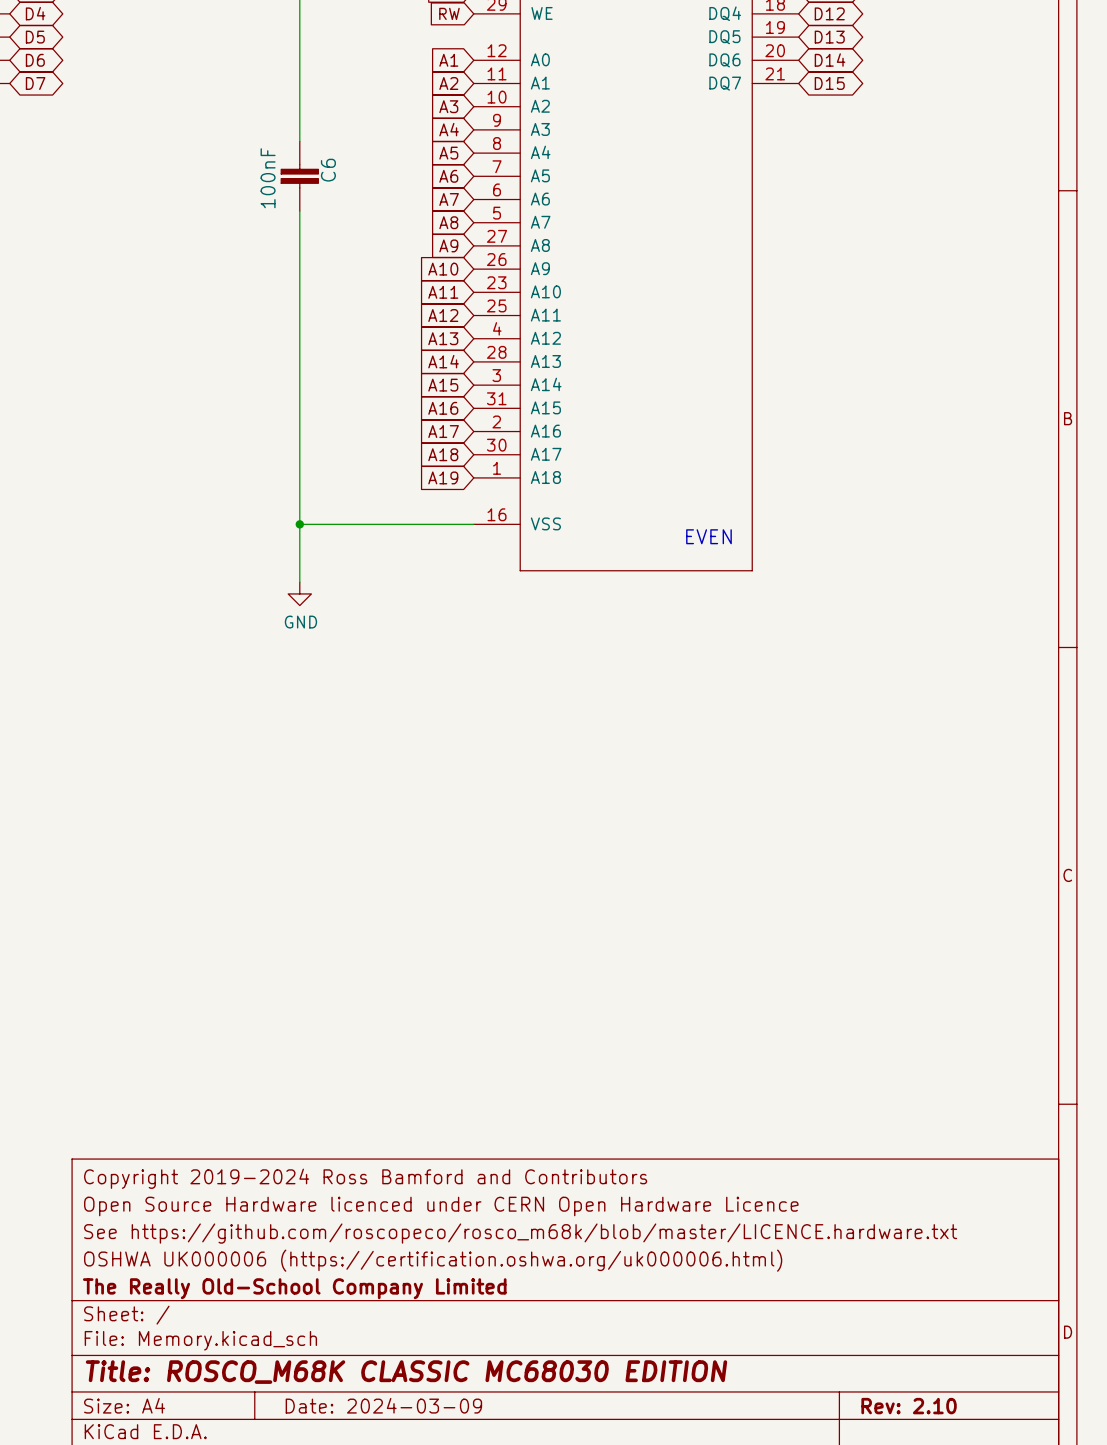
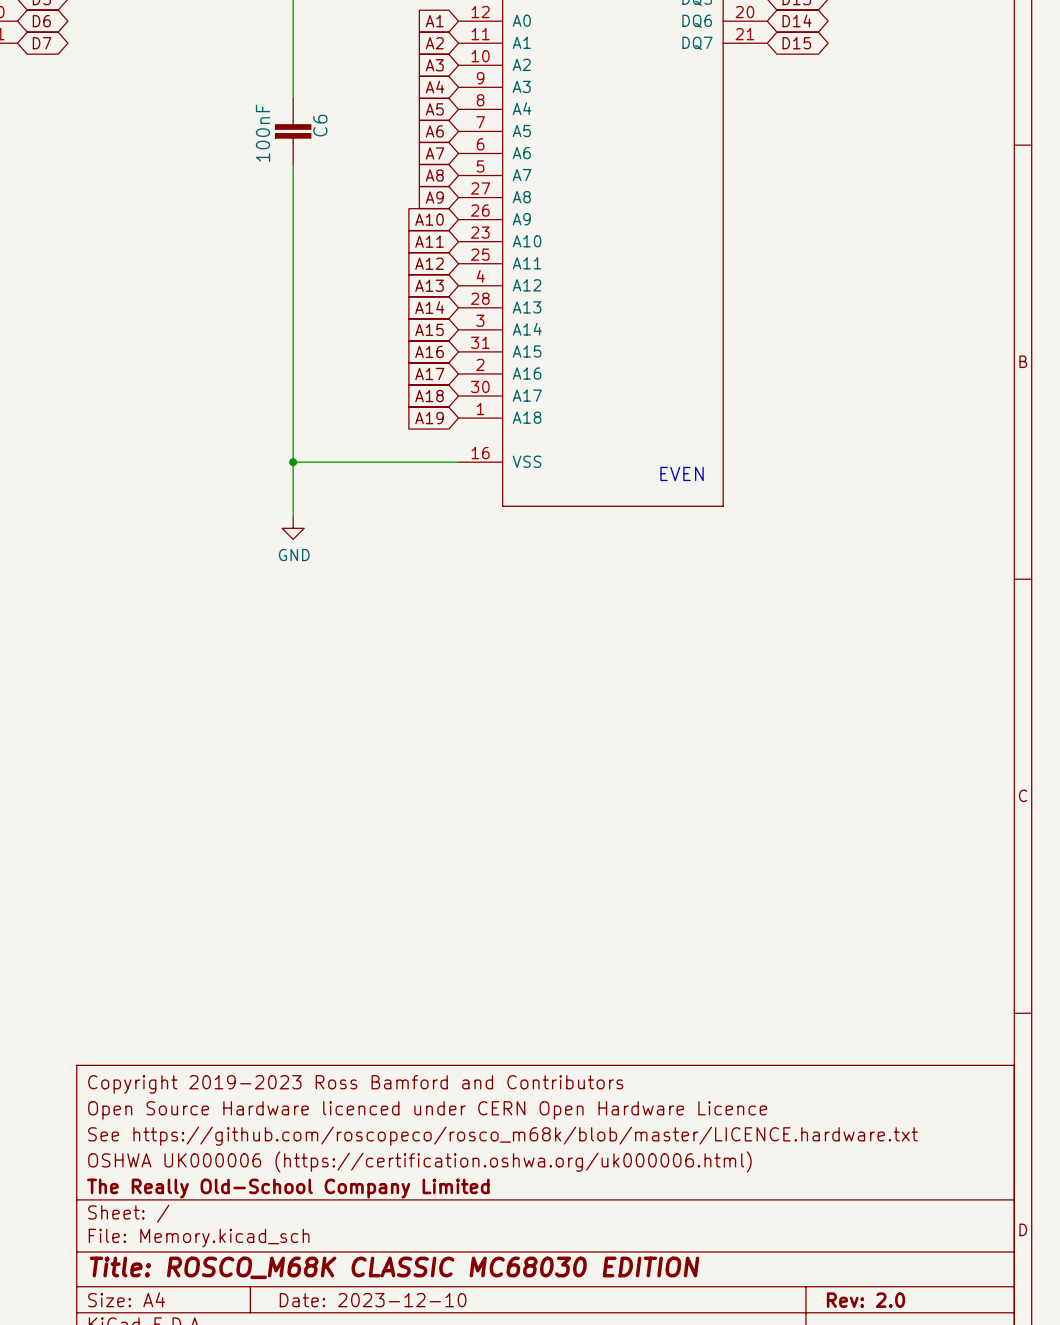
title block: Copyright 2019-2024 Ross Bamford and Contributors (365, 1178) -> Copyright 2019-2023 Ross Bamford and Contributors (355, 1084)
title block: Date: 2024-03-09 (383, 1405) -> Date: 2023-12-10 (373, 1300)
title block: Rev: 2.10 (909, 1406) -> Rev: 2.0 (865, 1300)

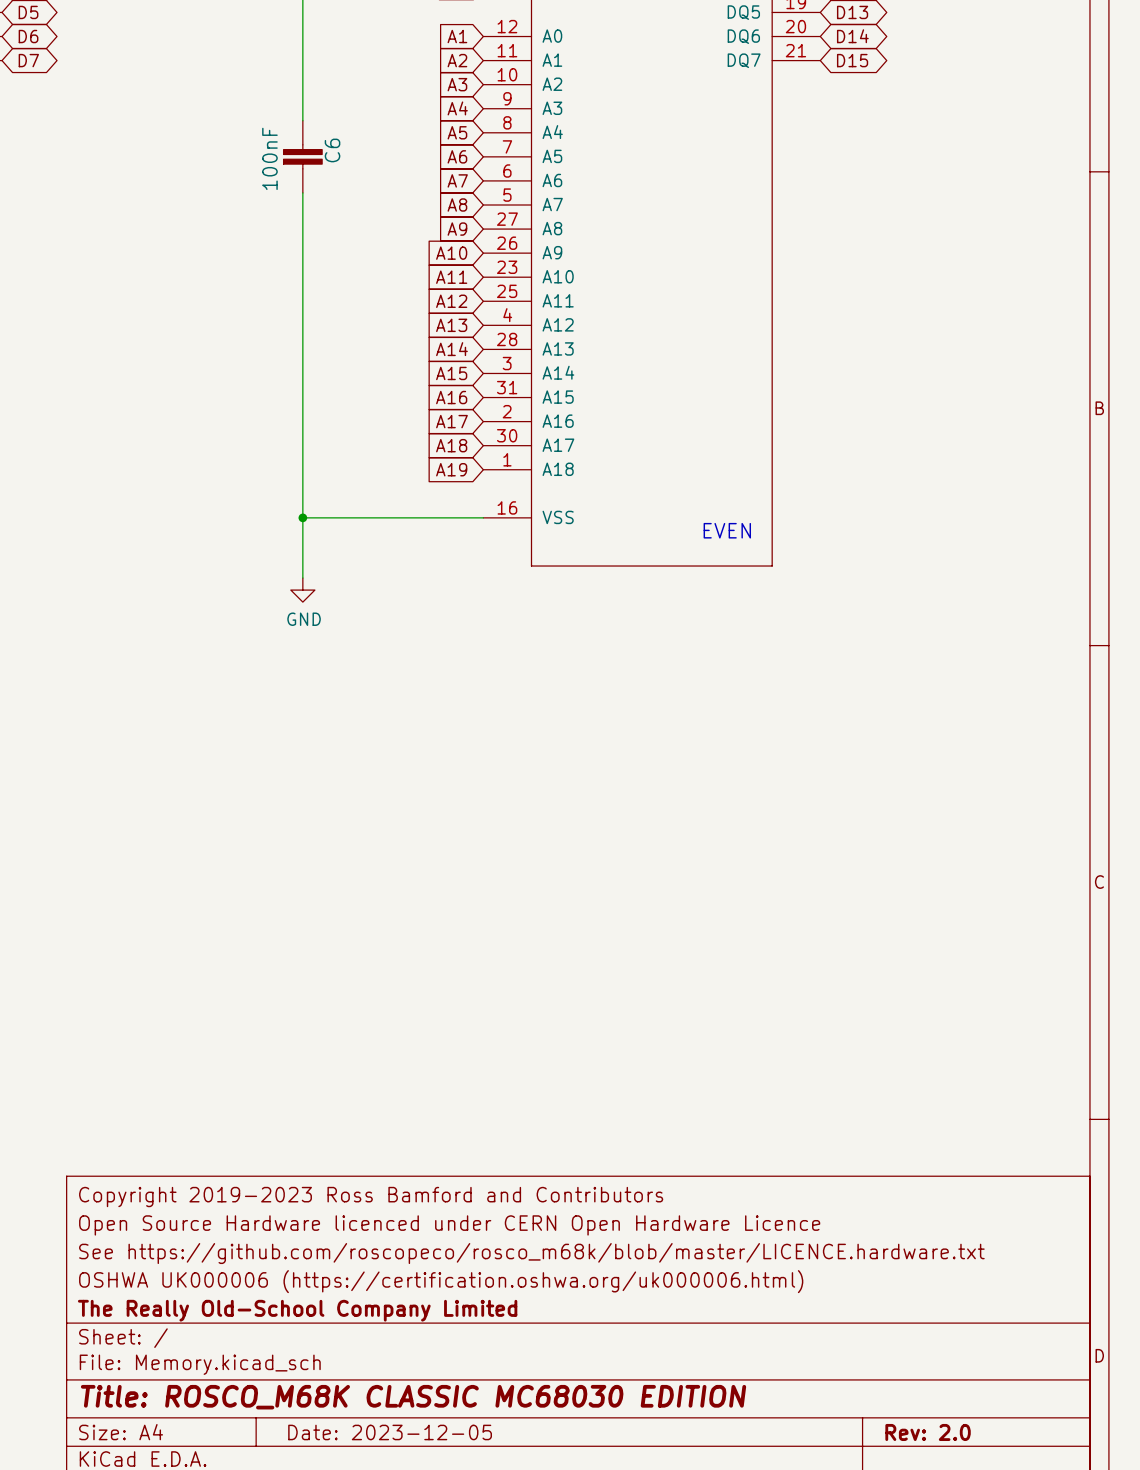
title block: Date: 2023-12-10 (373, 1300) -> Date: 2023-12-05 (390, 1432)

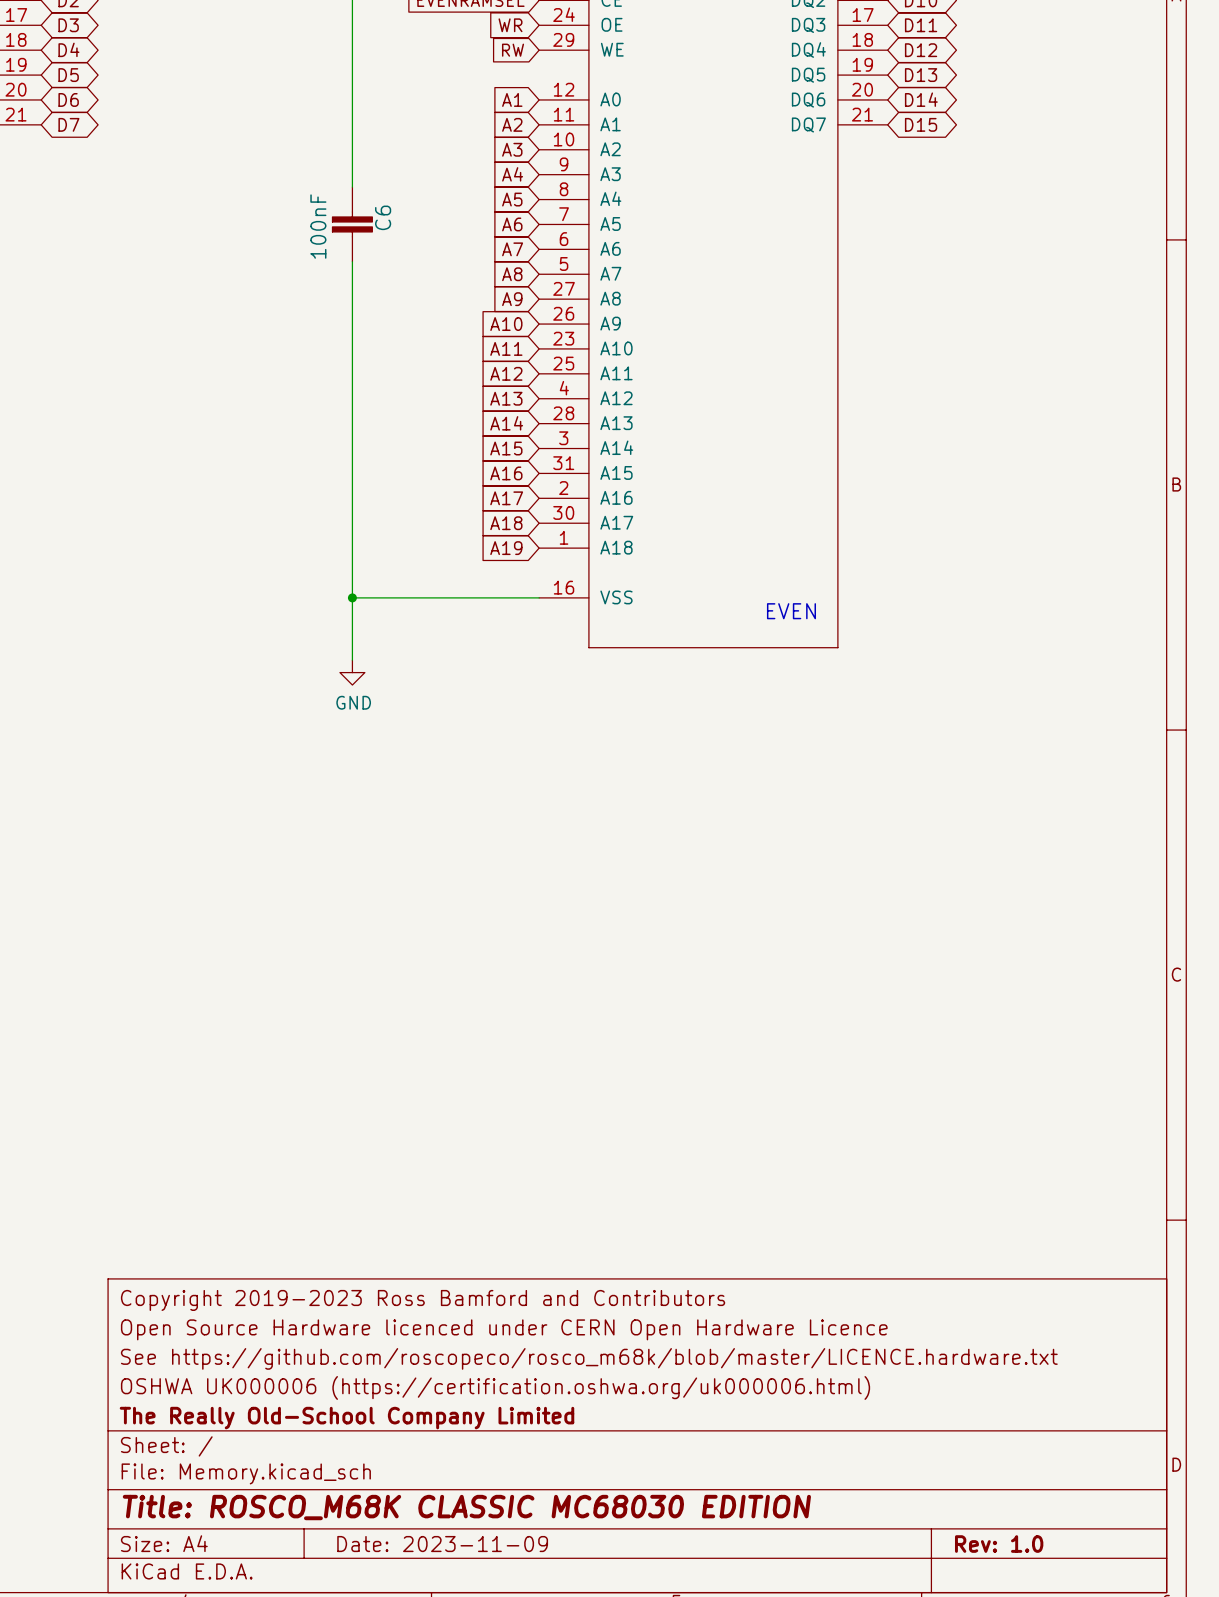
title block: Date: 2023-12-05 (390, 1432) -> Date: 2023-11-09 (442, 1544)
title block: Rev: 2.0 (928, 1432) -> Rev: 1.0 (999, 1544)

